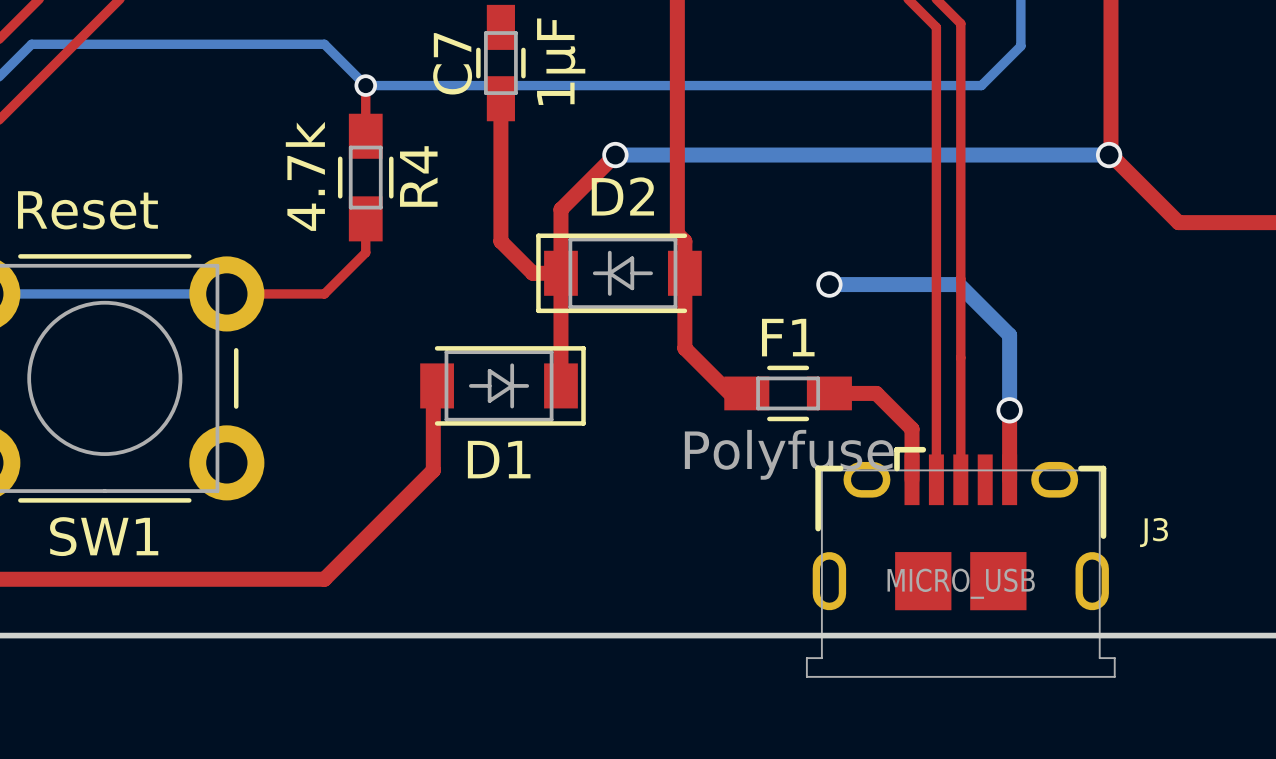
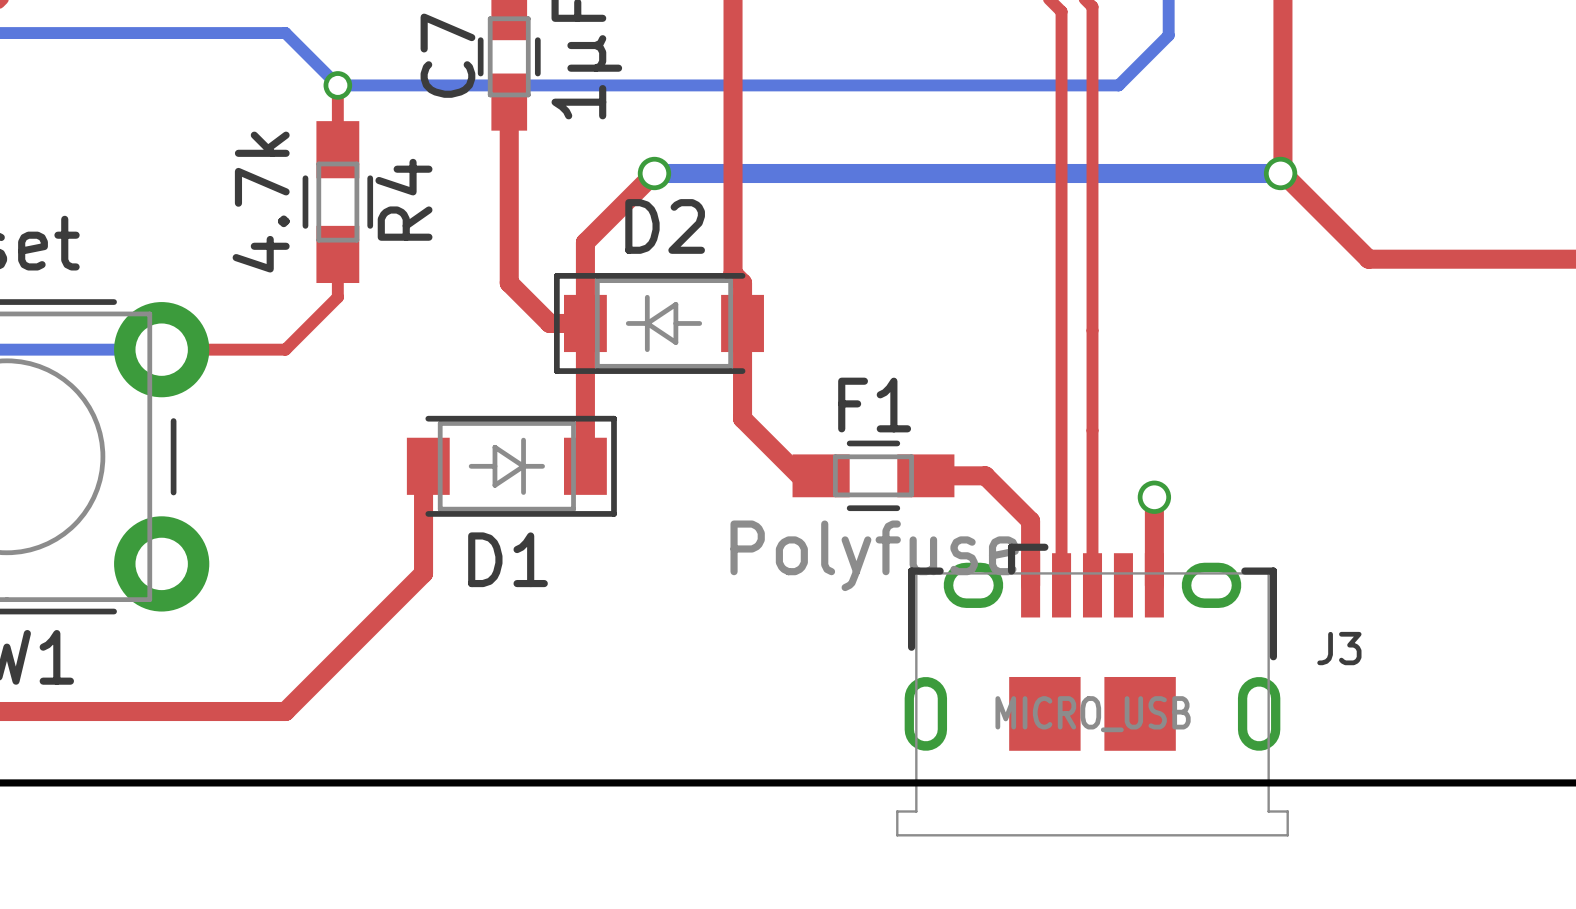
bottom track: (829, 284) (958, 284) (1009, 335) (1009, 410) -> none
via: (829, 284) -> none

